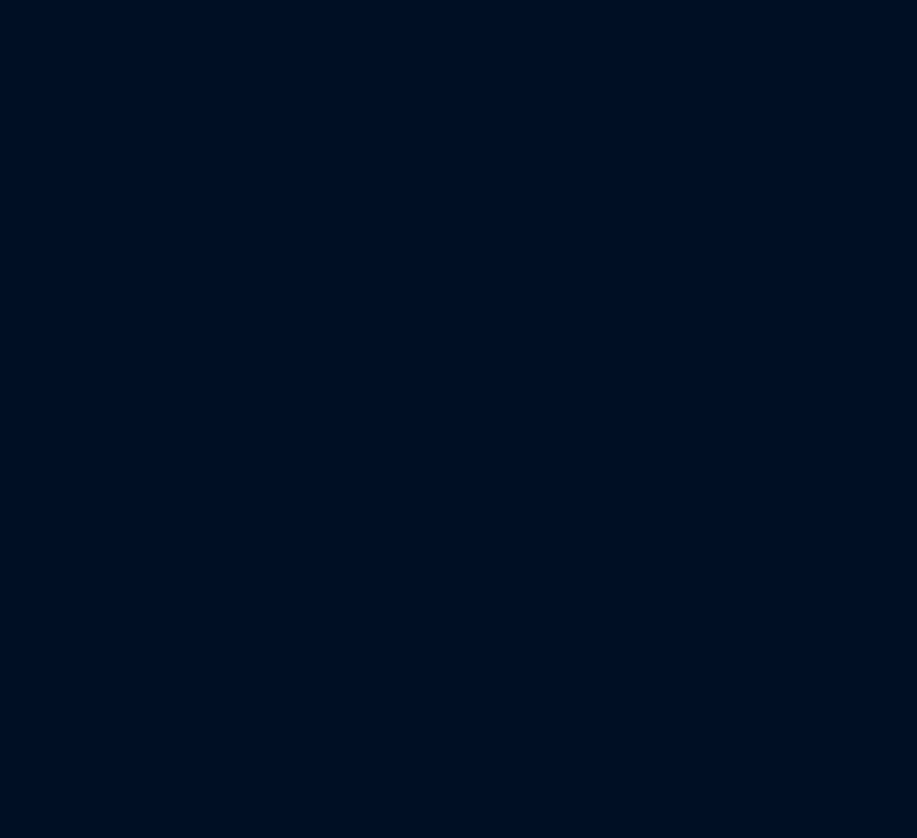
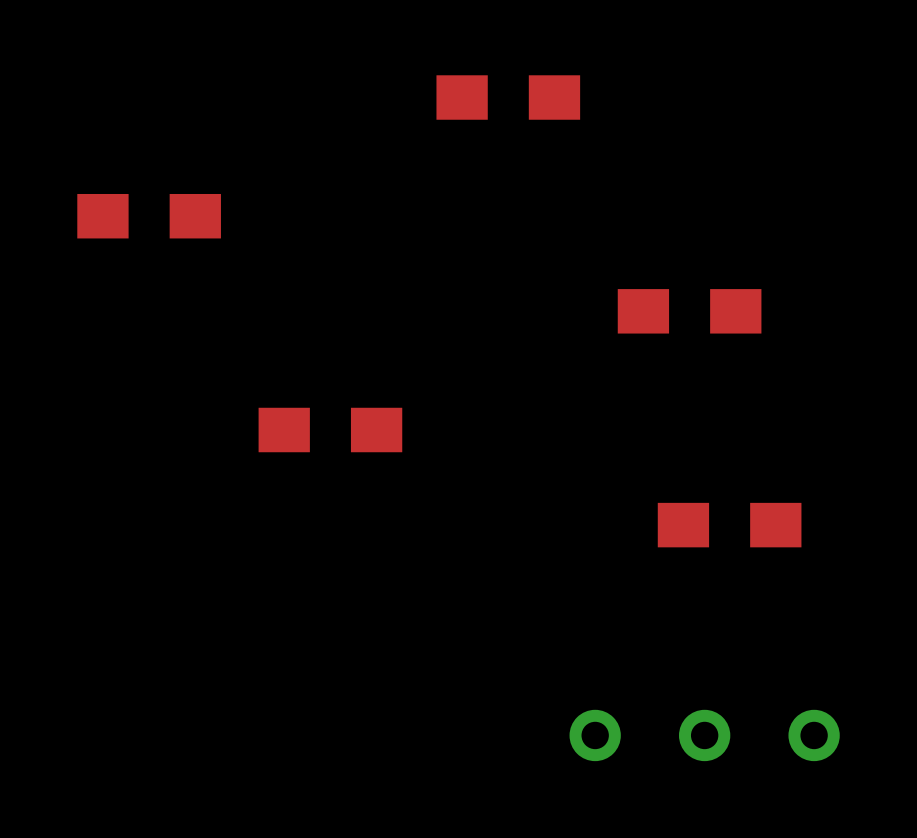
part: none -> (508, 97)
part: none -> (149, 216)
part: none -> (689, 311)
part: none -> (330, 430)
part: none -> (729, 525)
part: none -> (595, 735)
part: none -> (704, 735)
part: none -> (814, 735)

